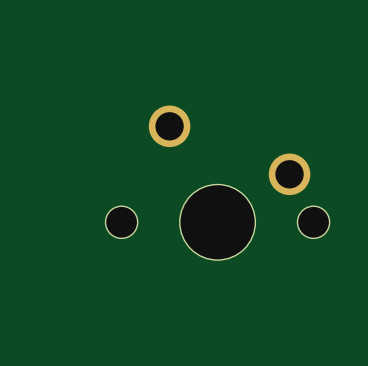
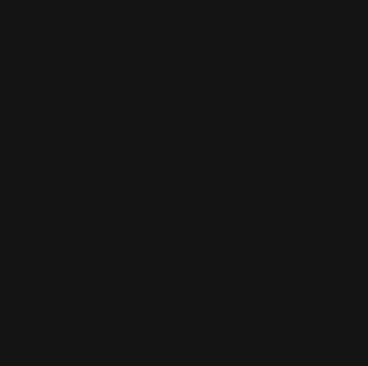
part: (217, 182) -> none

